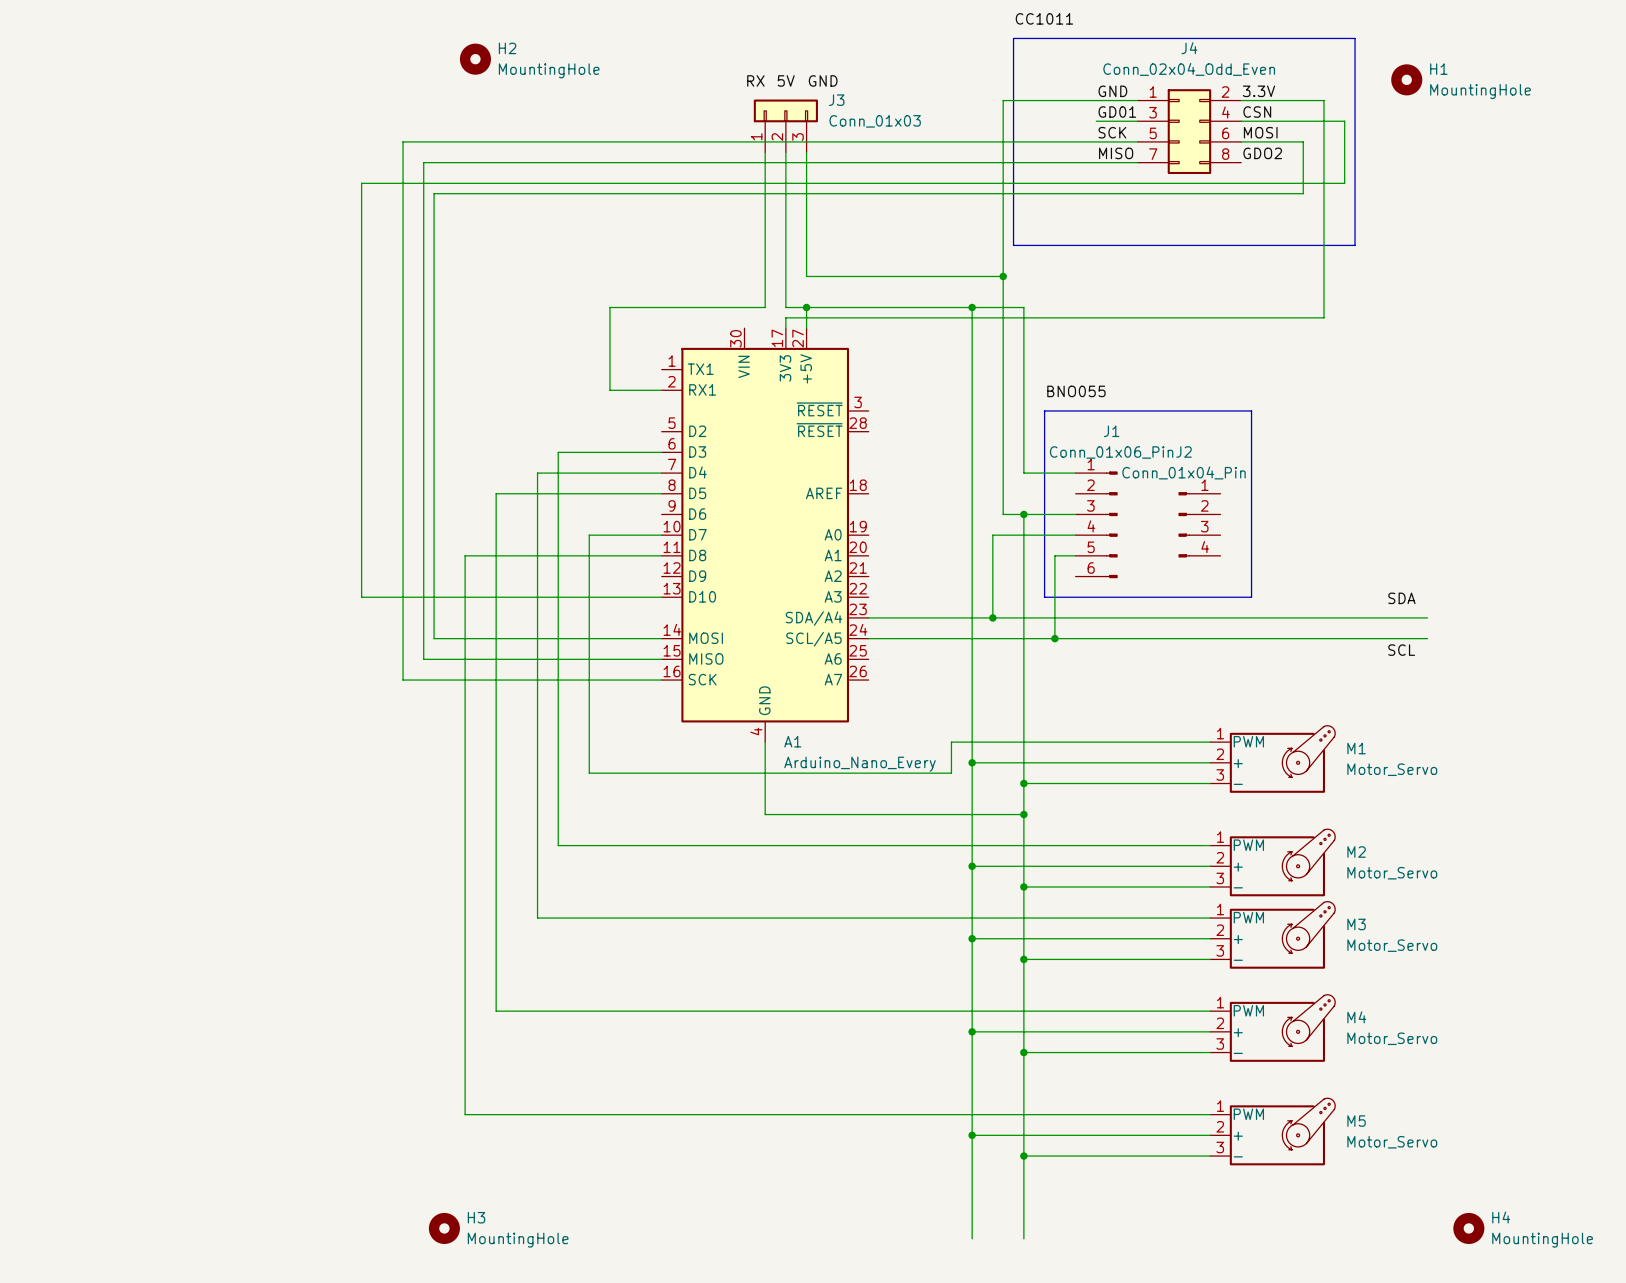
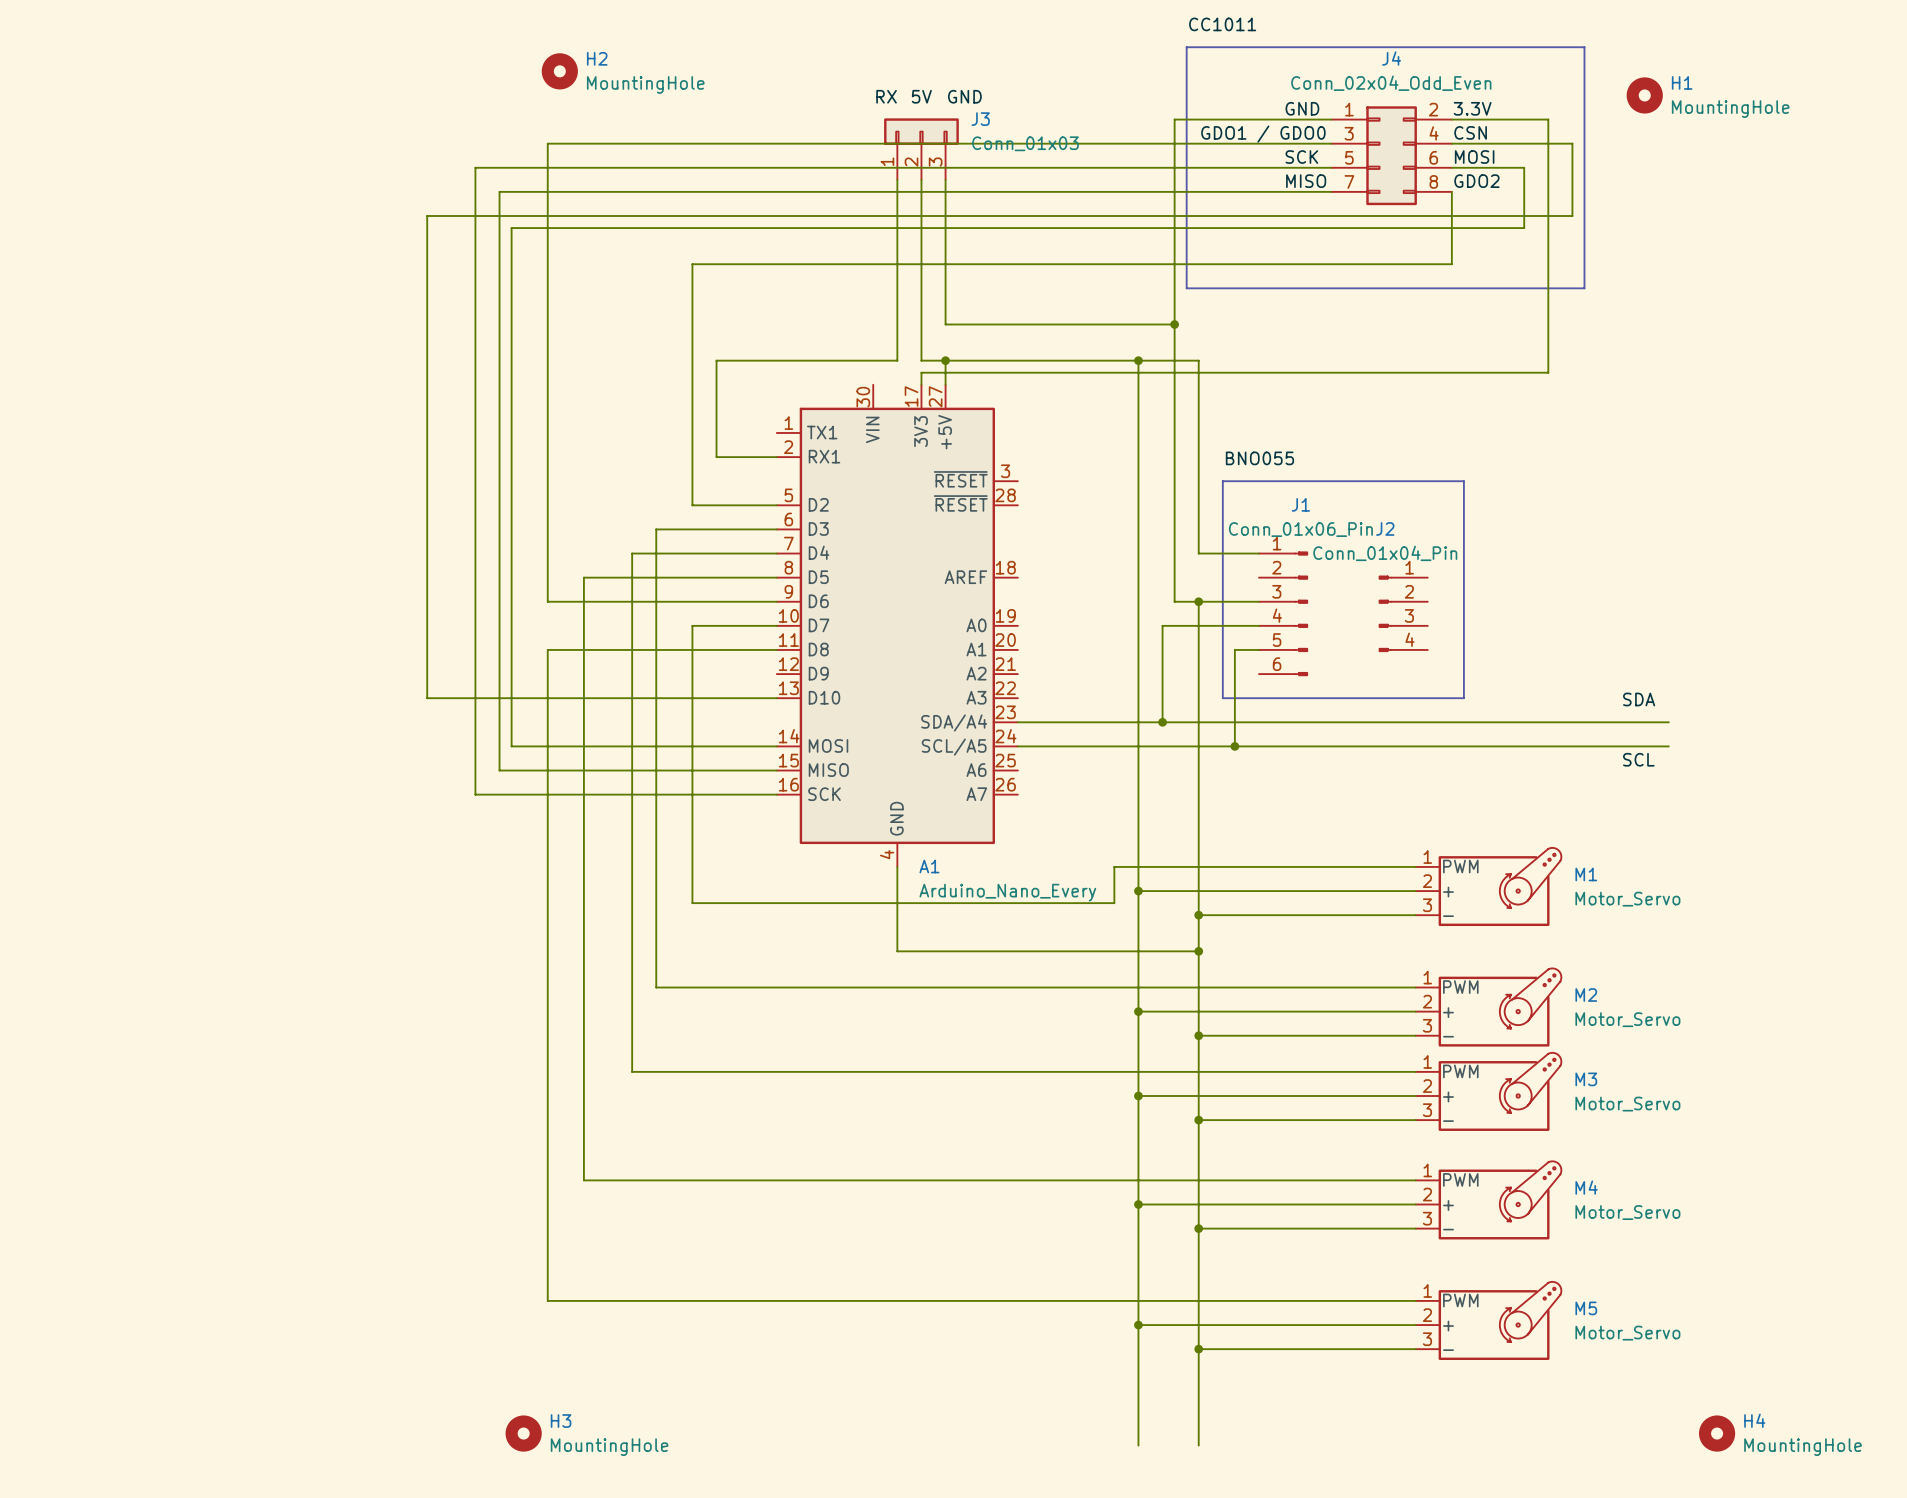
label: GD01 (1117, 112) -> none
label: none -> GDO1 / GDO0 (1263, 134)
wire: none -> (1283, 143) (547, 143) (547, 601) (776, 601)
wire: none -> (1451, 191) (1451, 264) (692, 264) (692, 505) (776, 505)

